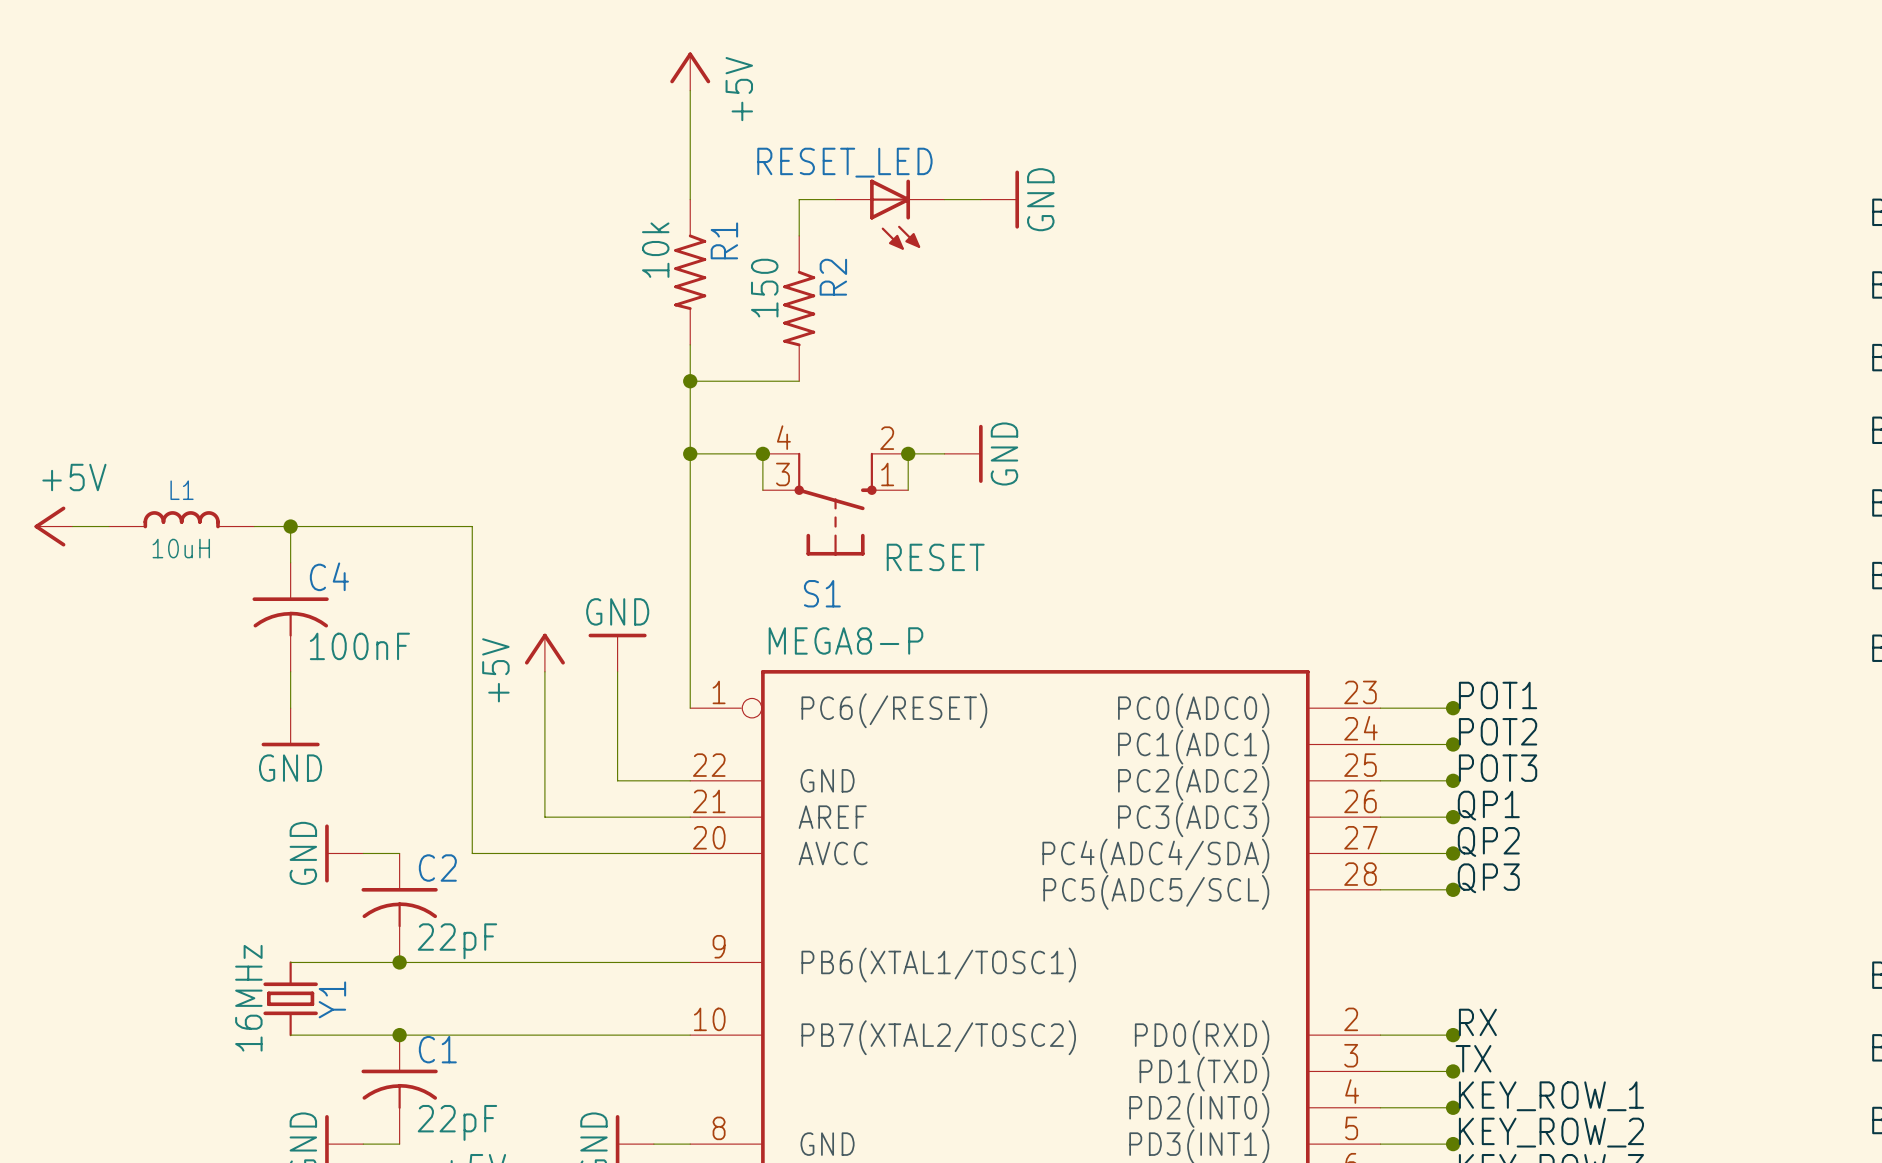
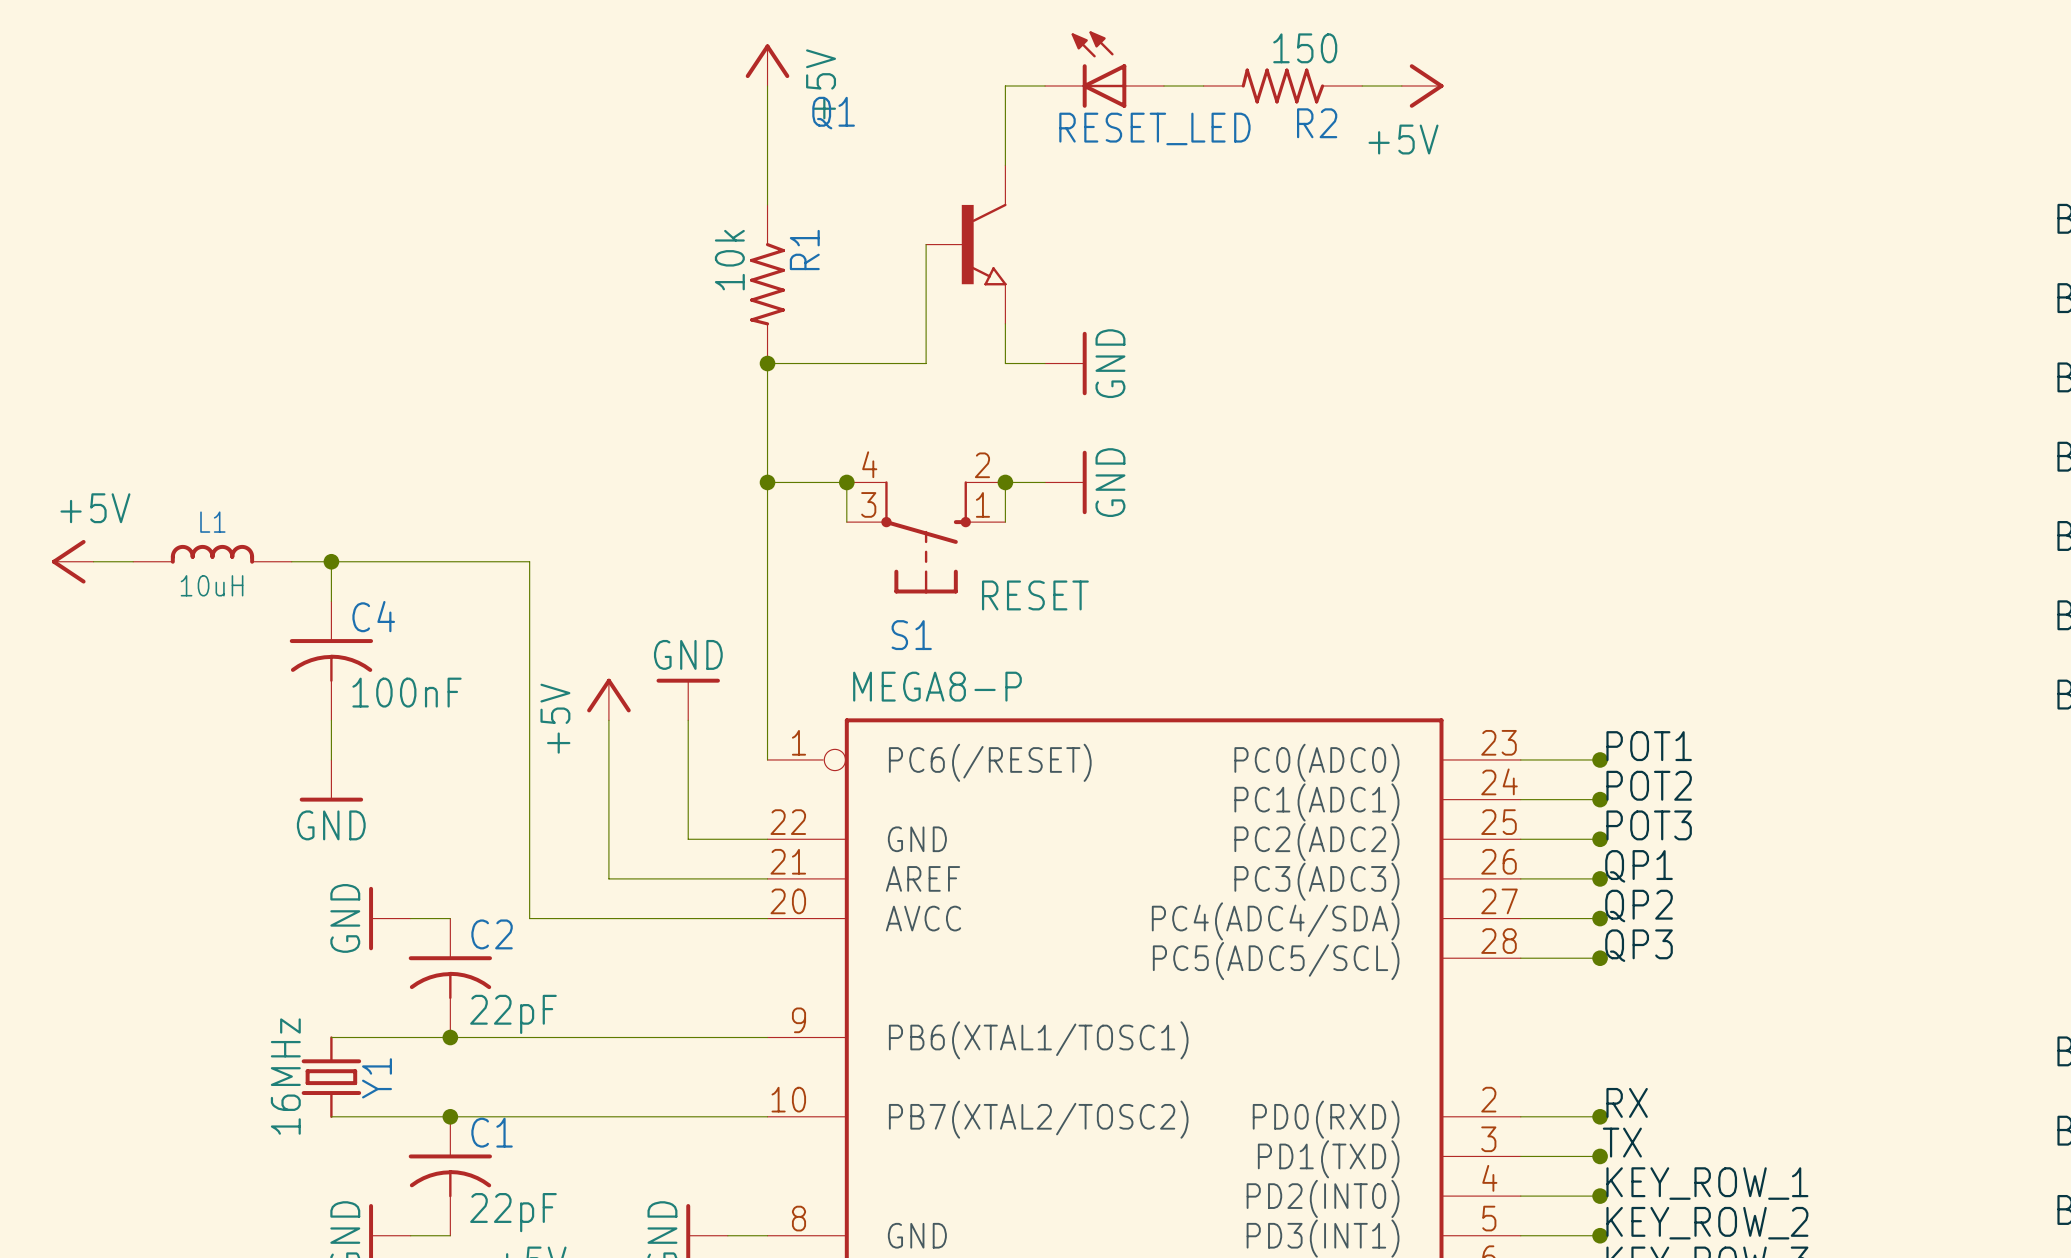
wire: none -> (1045, 86) (1005, 86) (1005, 165)
wire: none -> (1362, 86) (1401, 86)
power symbol: none -> +5V (1422, 86)
wire: (835, 199) (799, 199) (799, 235) -> none
wire: (944, 199) (980, 199) -> (1163, 86) (1203, 86)
power symbol position: GND (999, 199) -> GND (1065, 363)
RESET_LED position: (890, 214) -> (1104, 69)
RESET_LED rotation: 0° (895, 214) -> 180° (1098, 69)
wire: none -> (926, 244) (926, 363) (767, 363)
Q1: none -> (966, 244)
R2 rotation: 0° (799, 308) -> 90° clockwise (1282, 86)
R2 position: (799, 308) -> (1282, 86)
wire: none -> (1005, 323) (1005, 363) (1045, 363)
wire: (690, 381) (799, 381) -> none
junction position: (690, 381) -> (767, 363)

